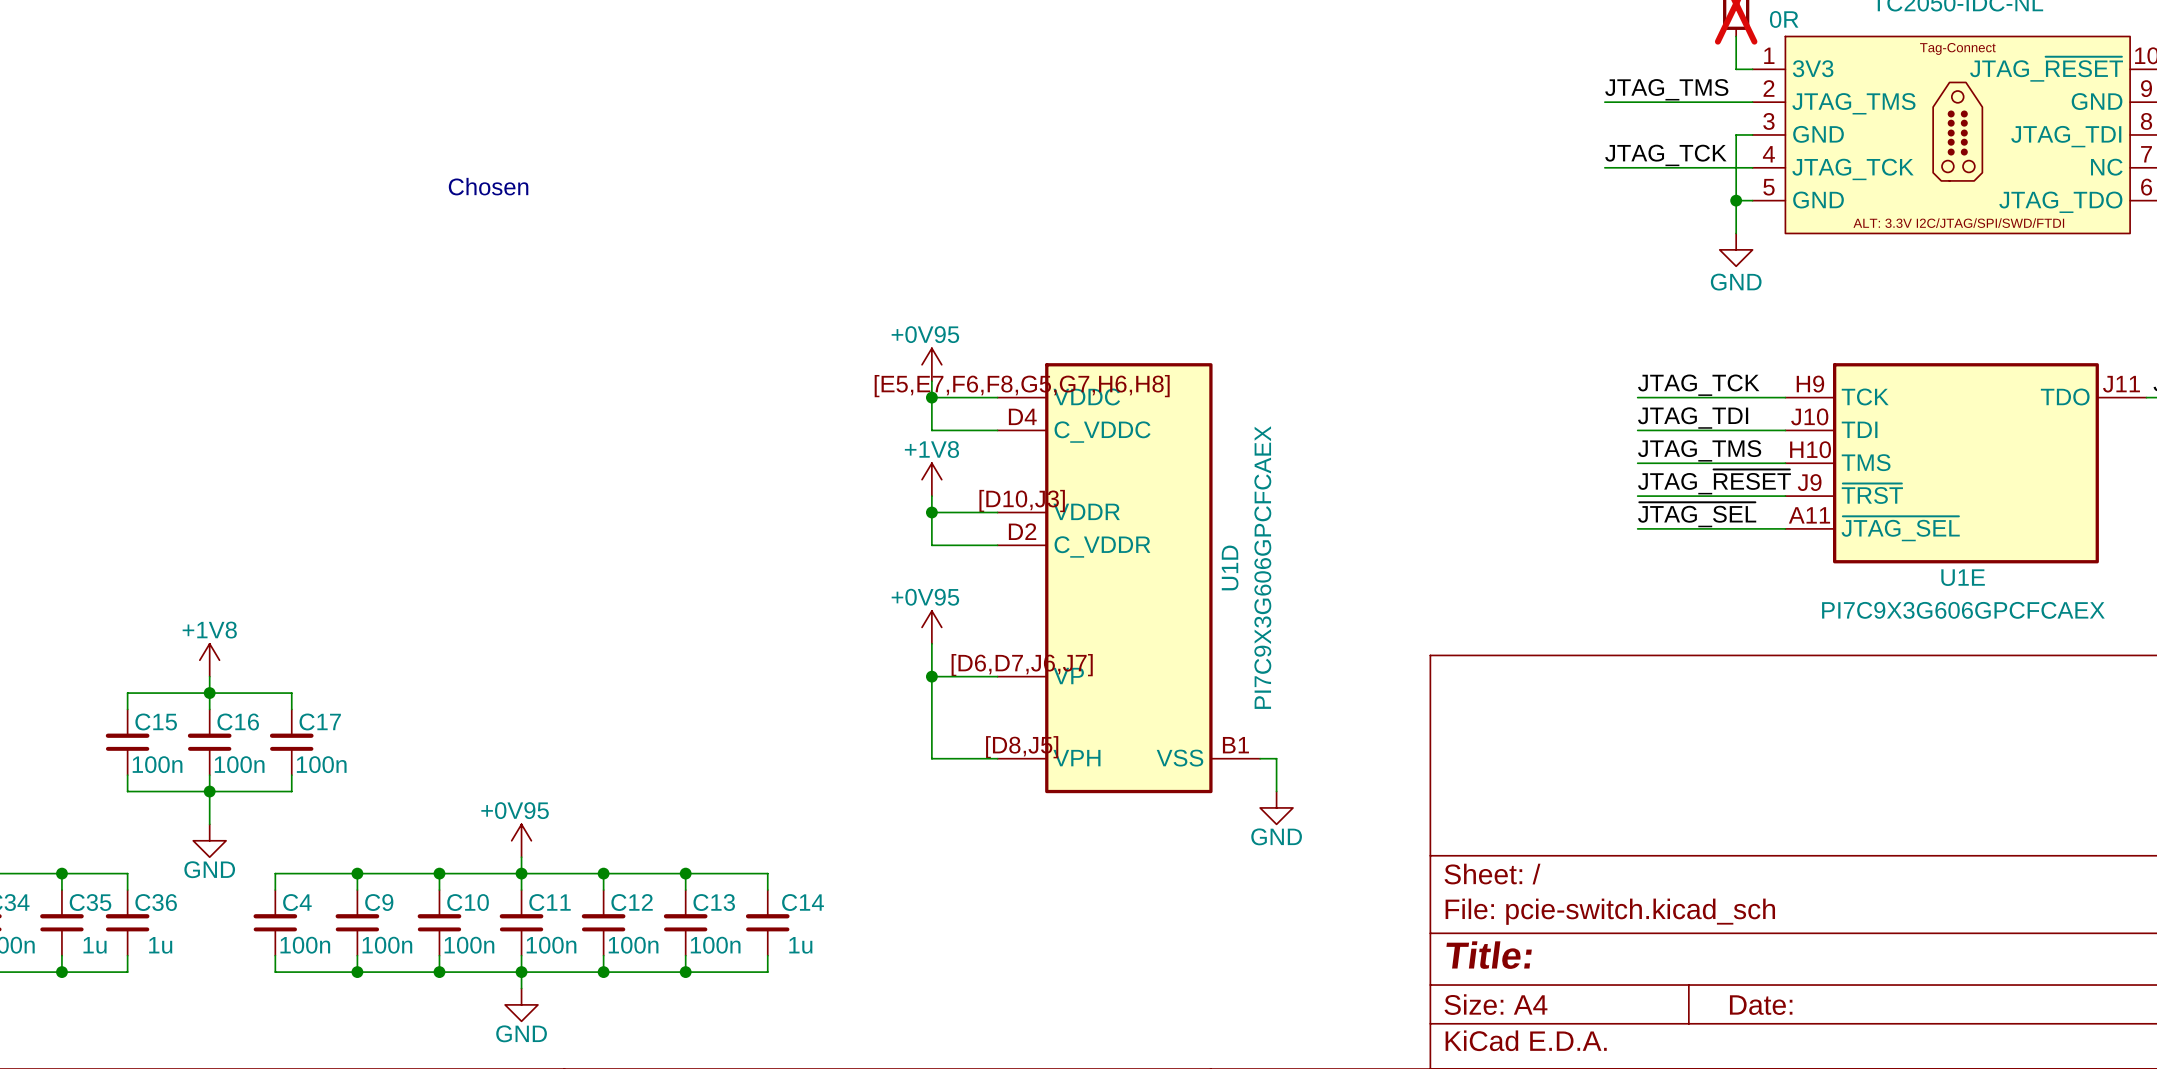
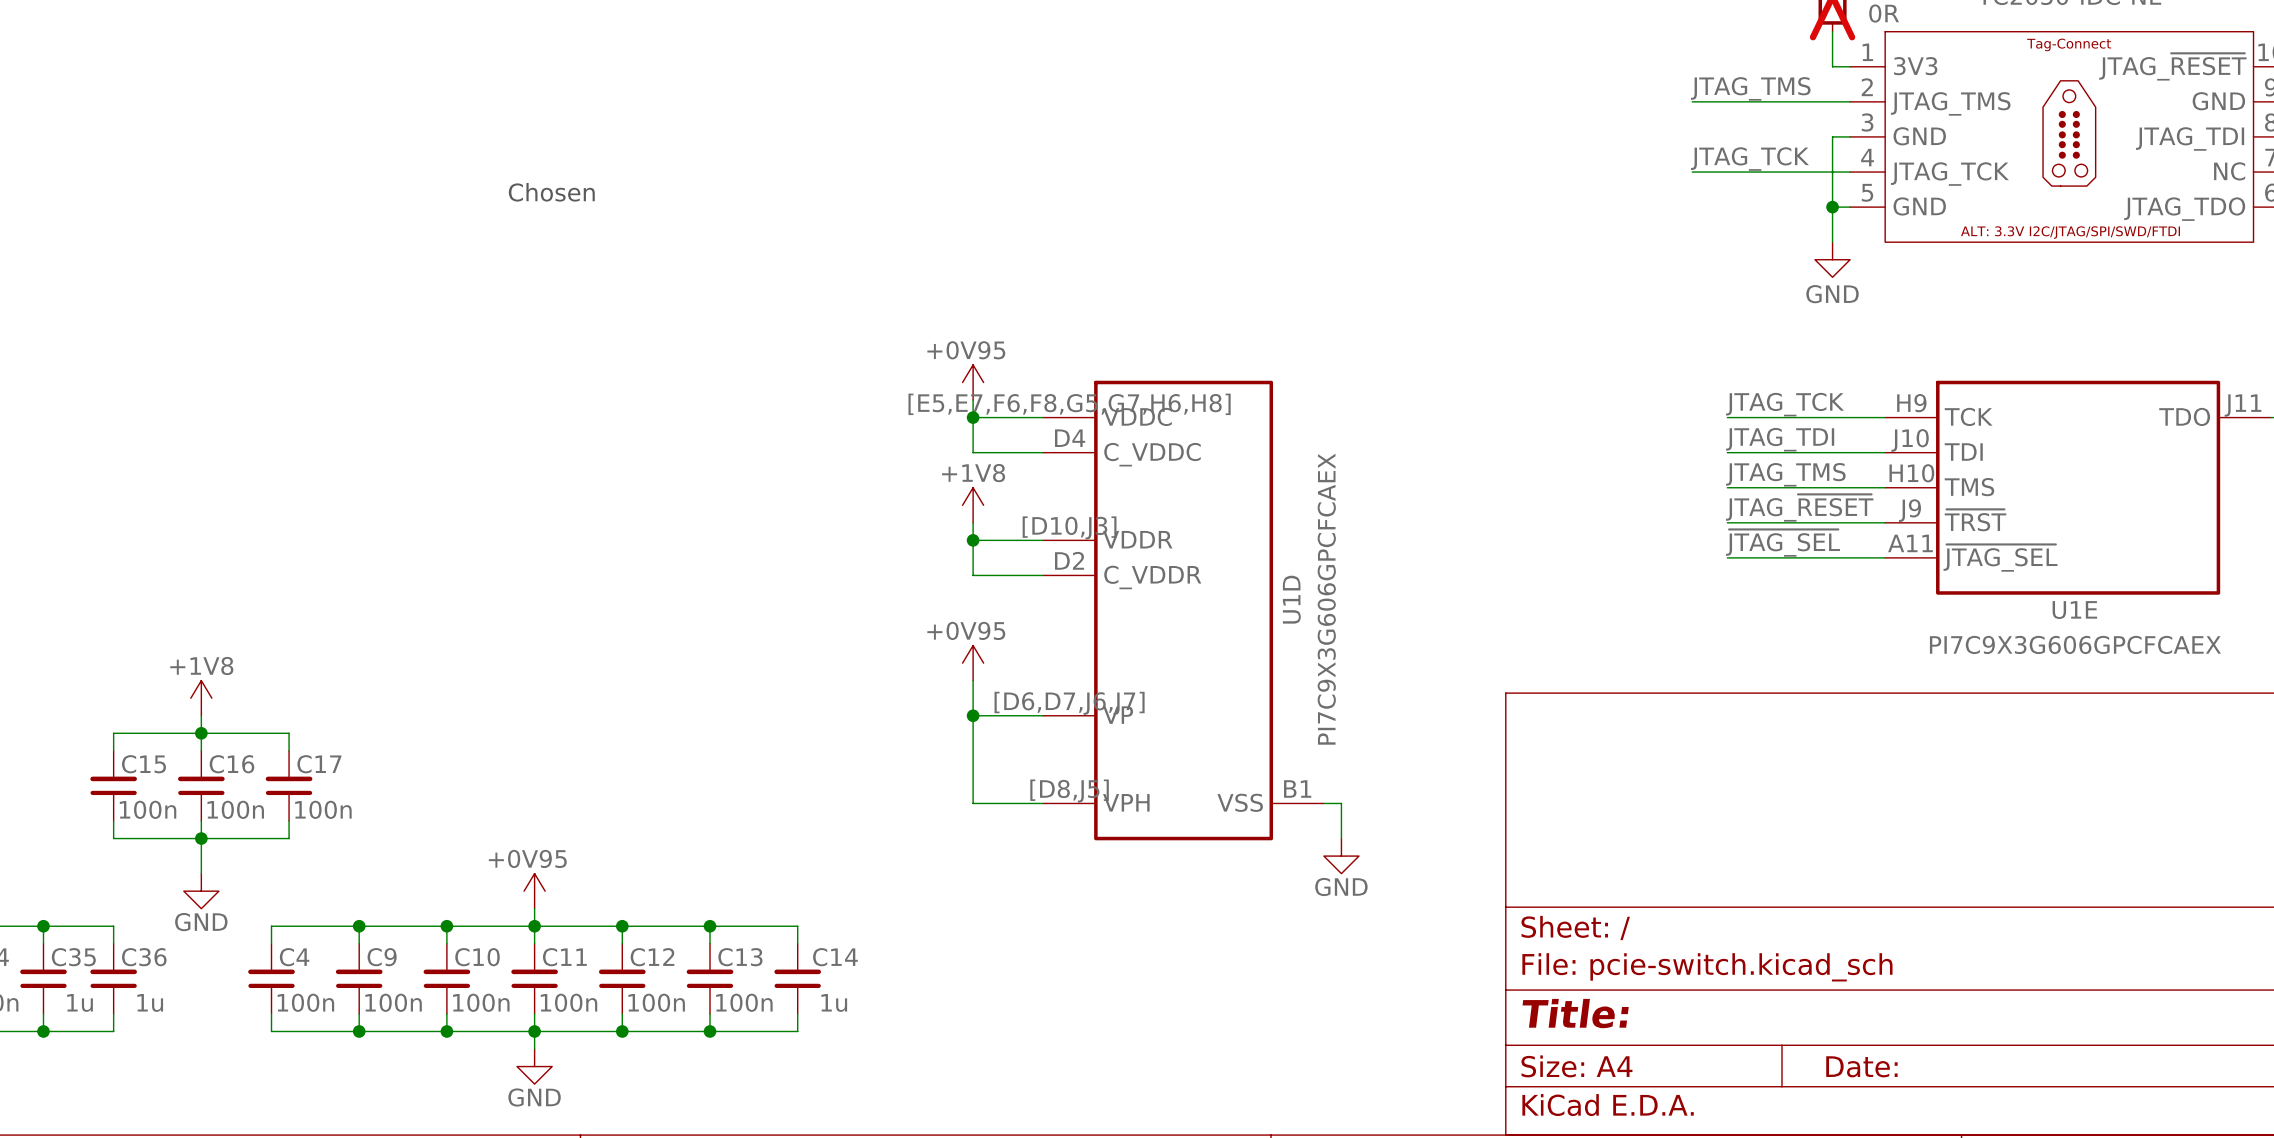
text position: Chosen (488, 186) -> Chosen (551, 192)

